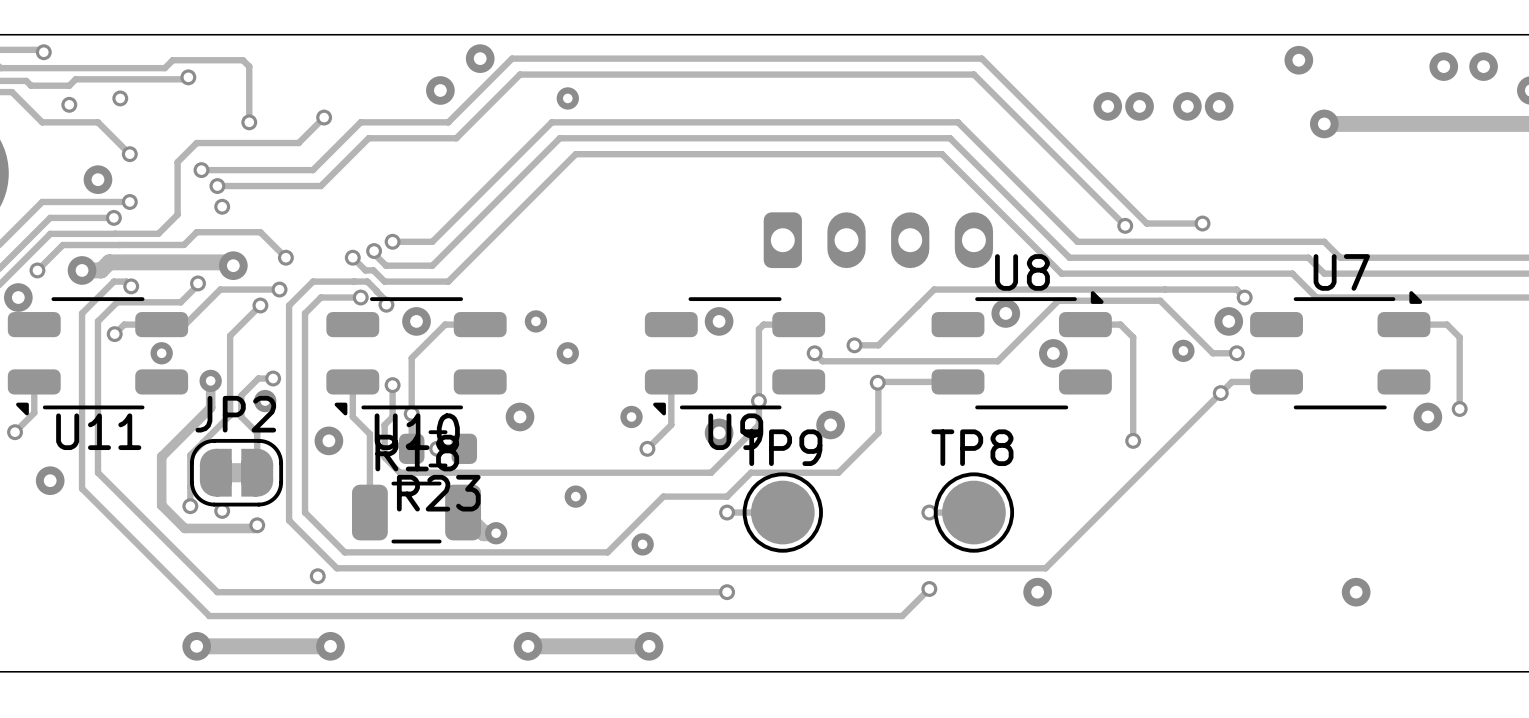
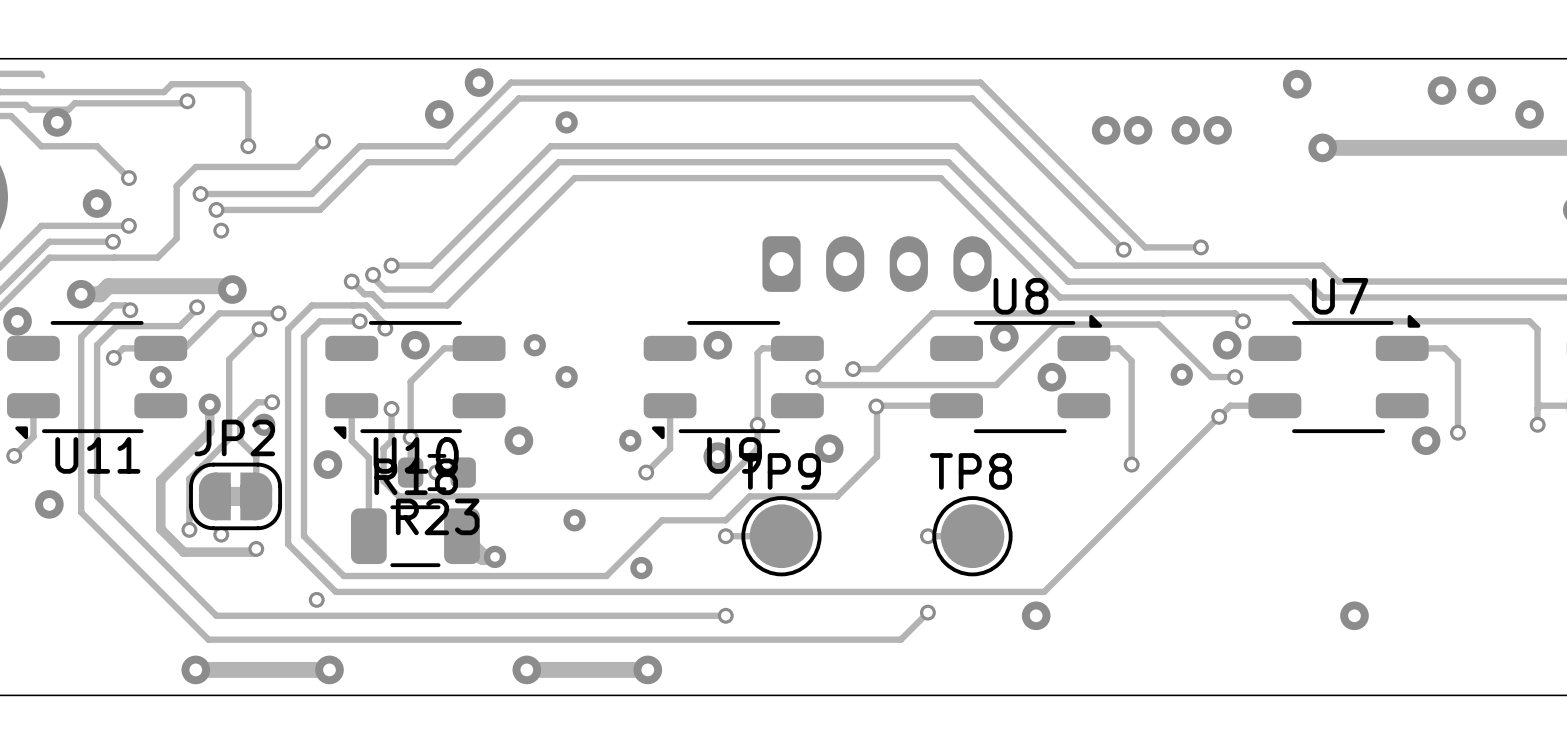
via: (43, 52) -> none
via size: [61, 96, 78, 113] -> [42, 108, 72, 137]
via: (120, 98) -> none
track: (285, 257) (260, 232) (196, 232) (183, 244) (62, 245) (37, 270) -> none
via: (285, 257) -> none
via: (37, 270) -> none

